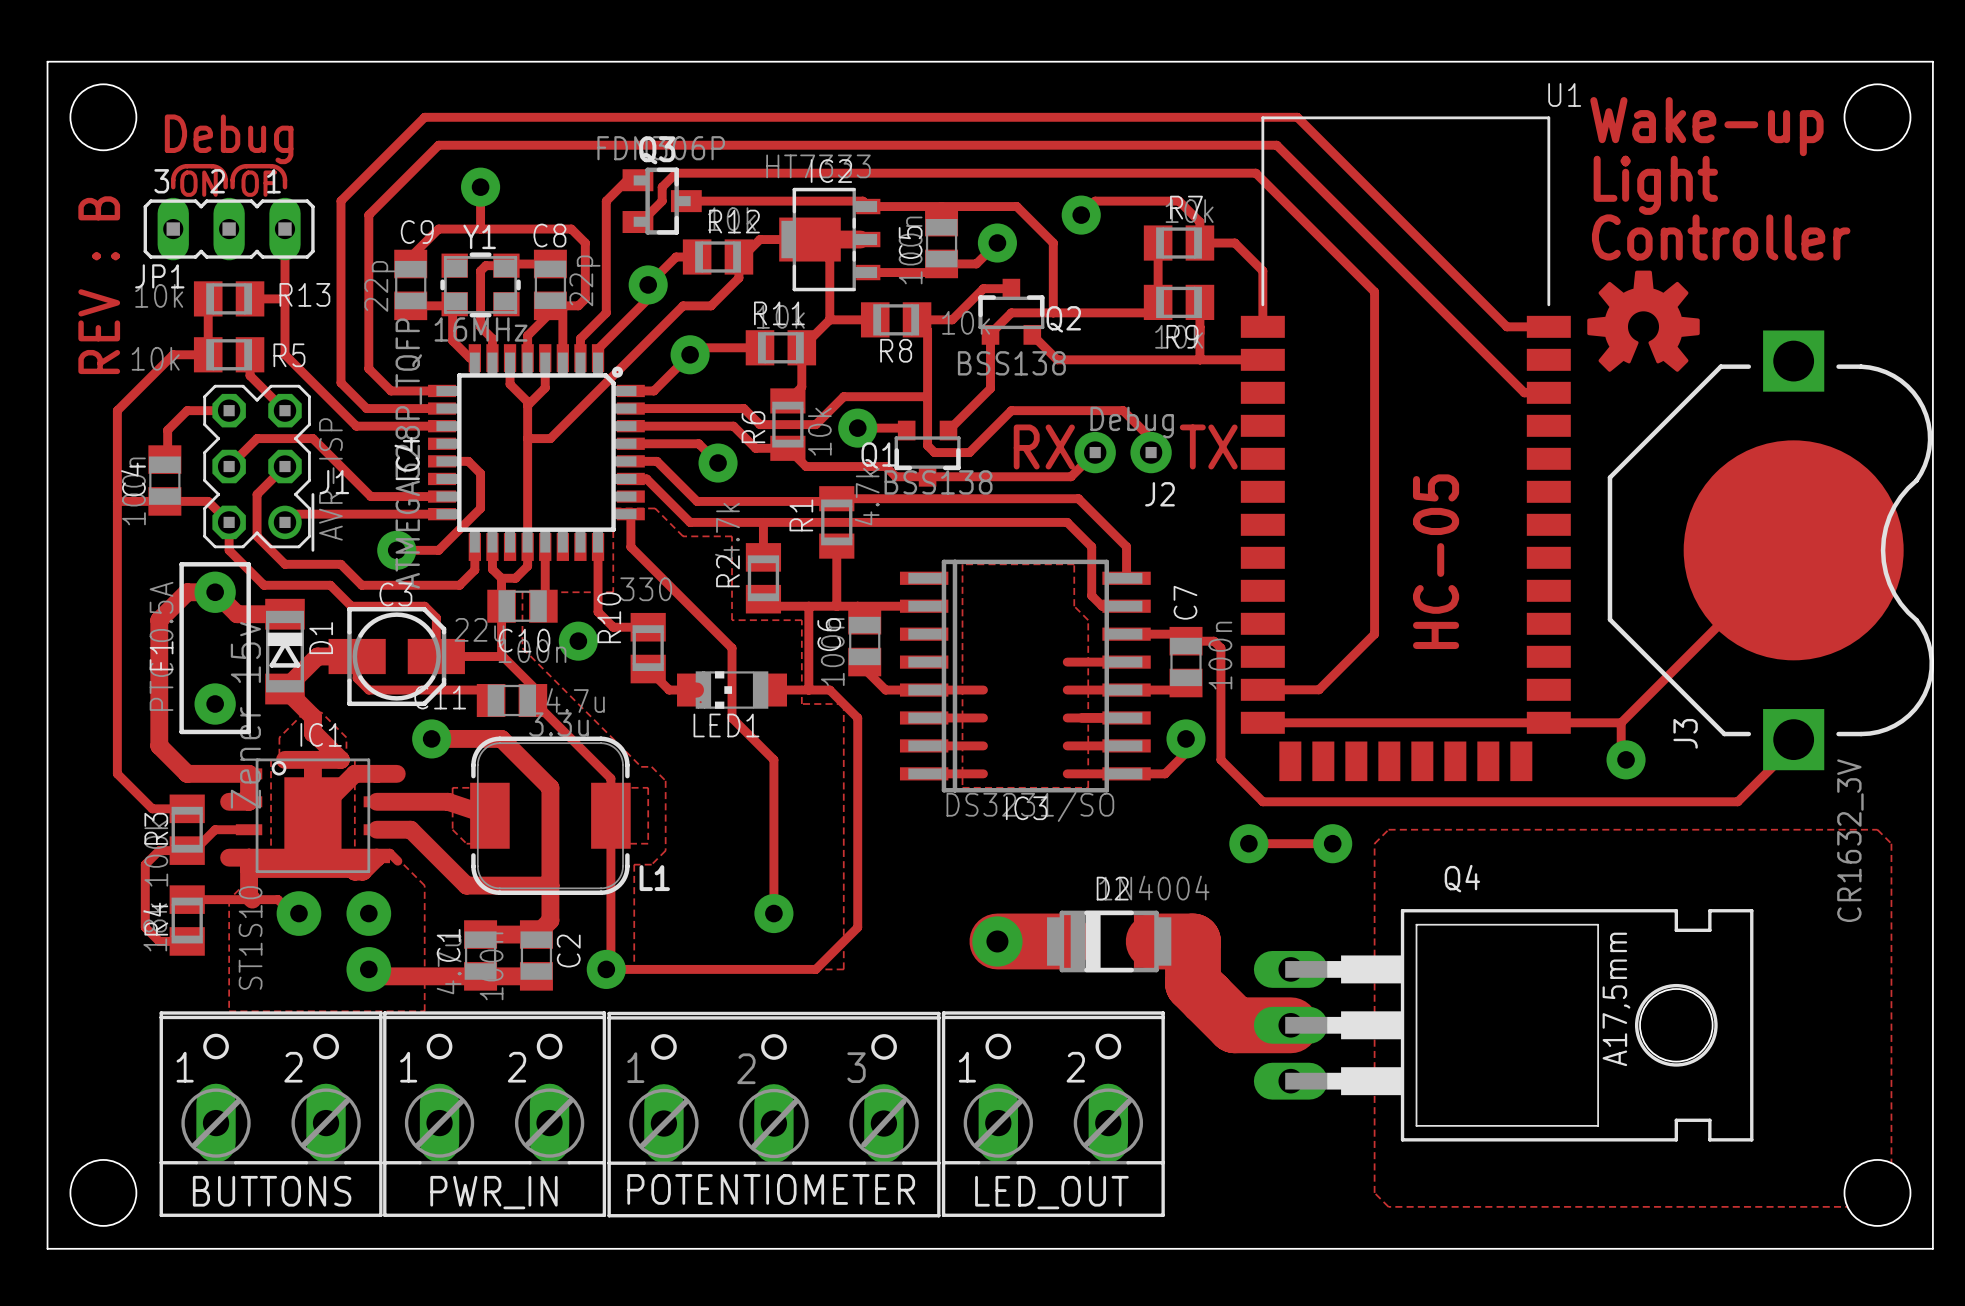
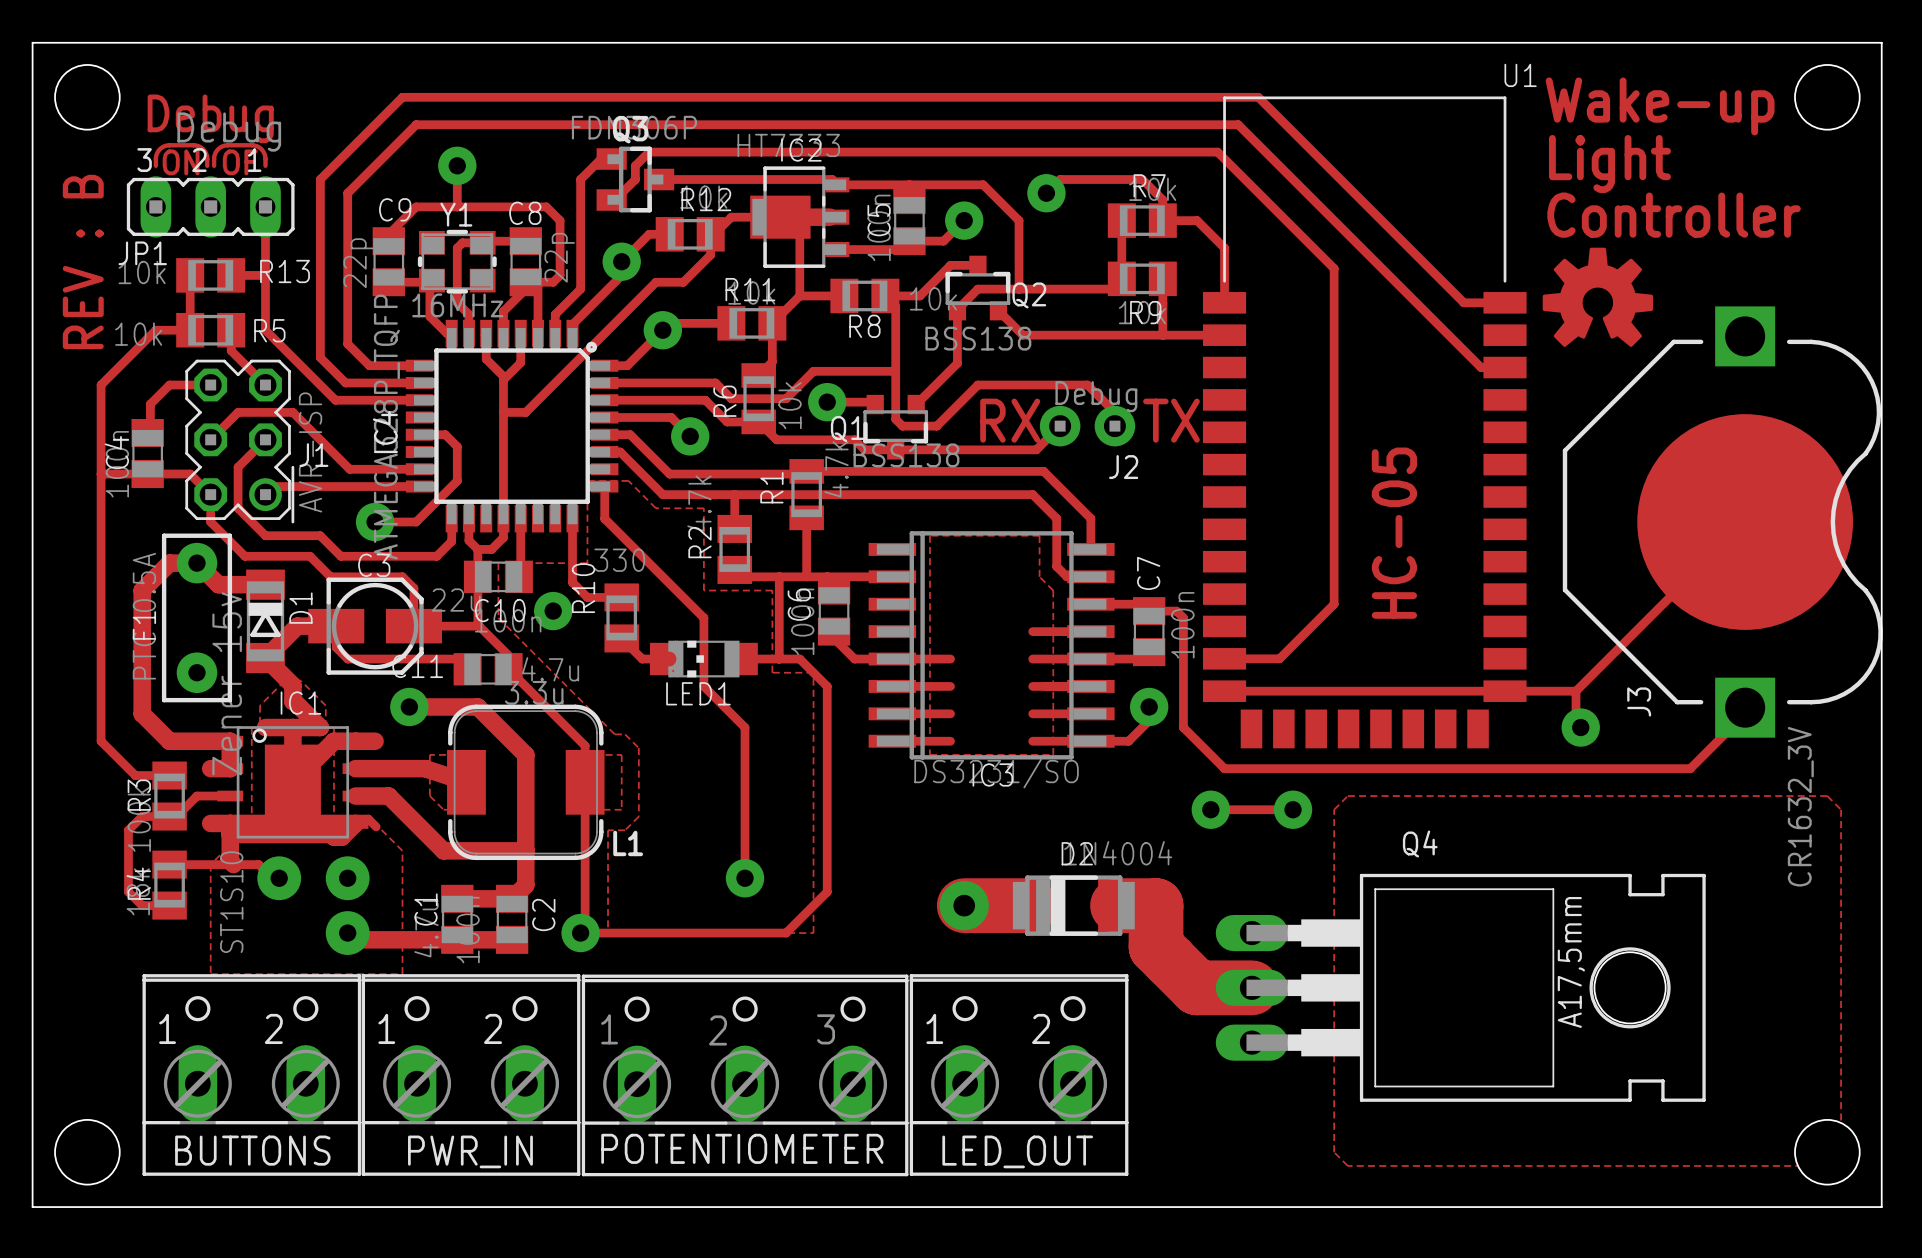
JP1 value: none -> Debug (229, 132)

